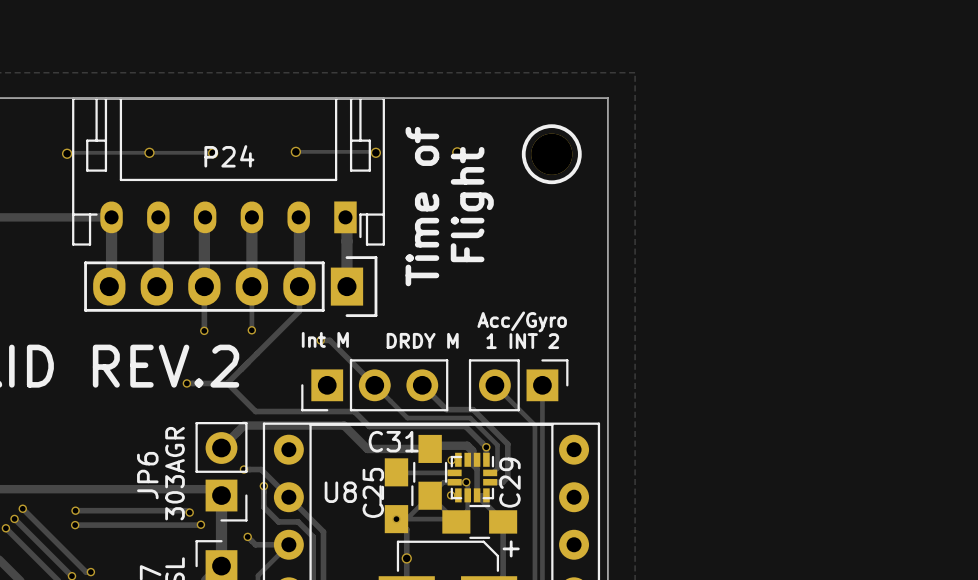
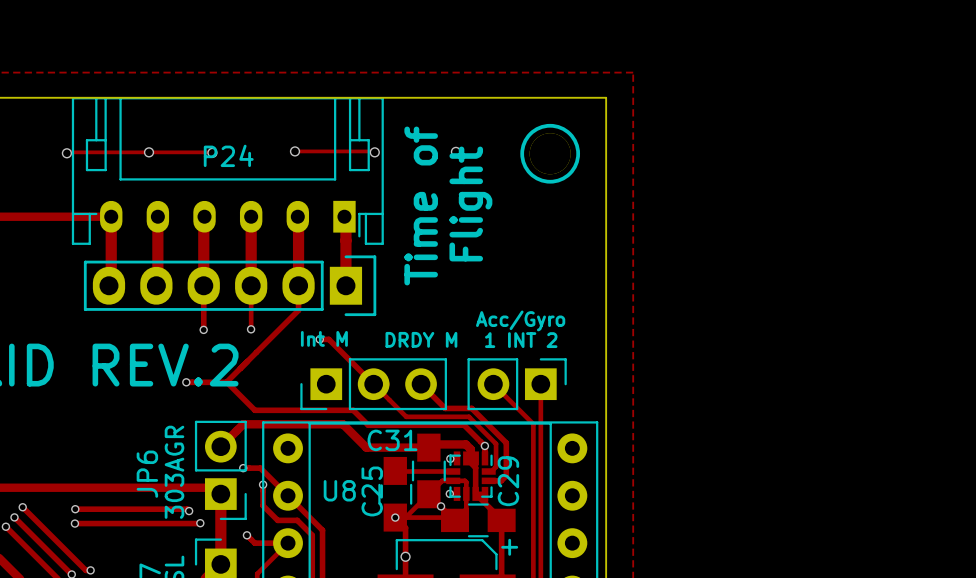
via position: (466, 482) -> (441, 506)

